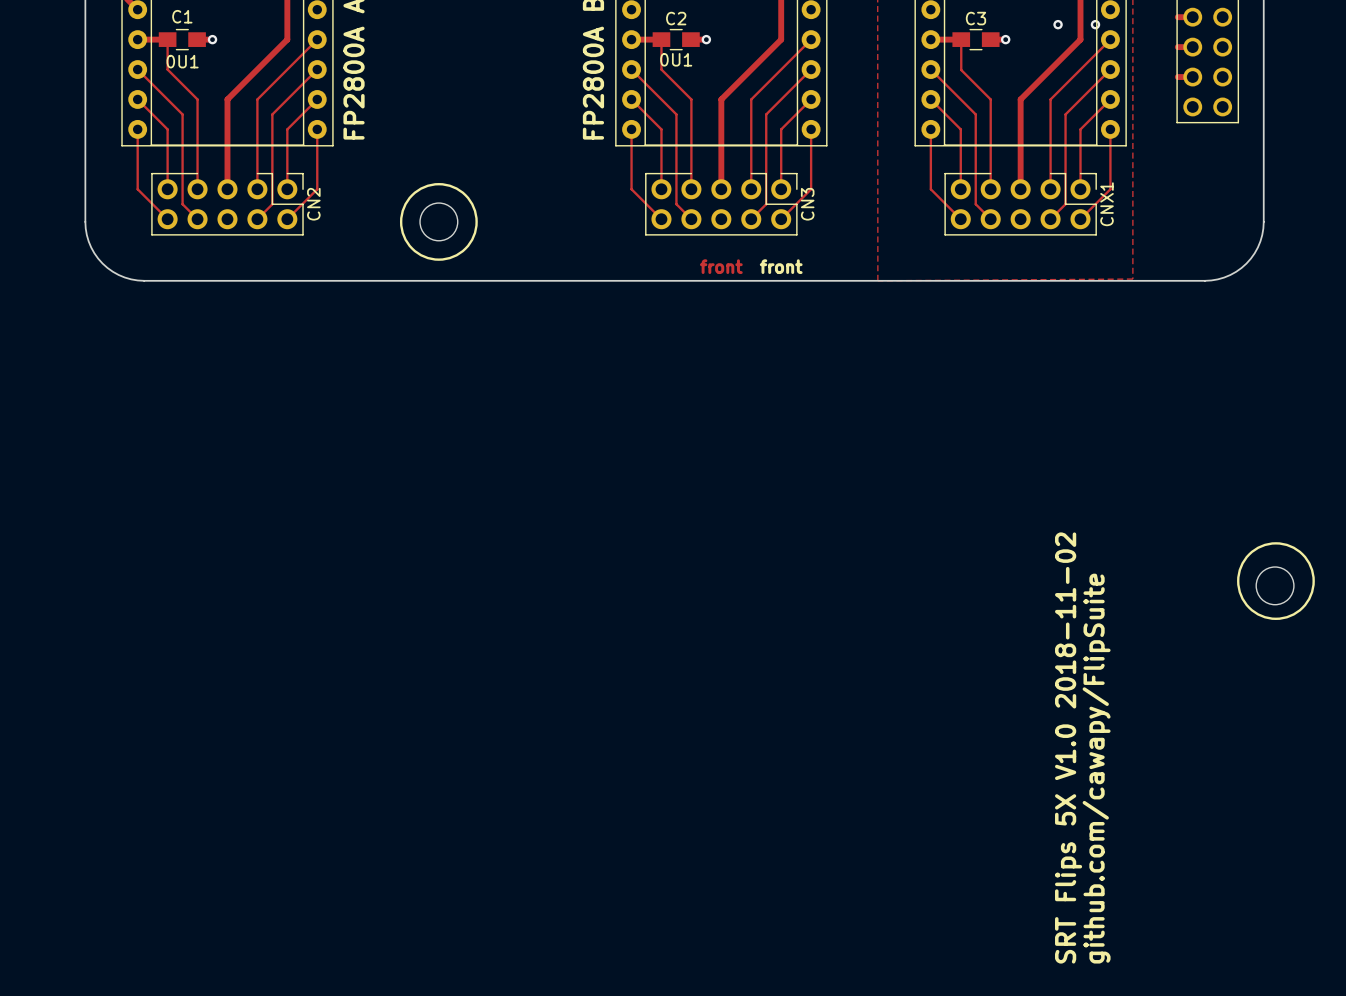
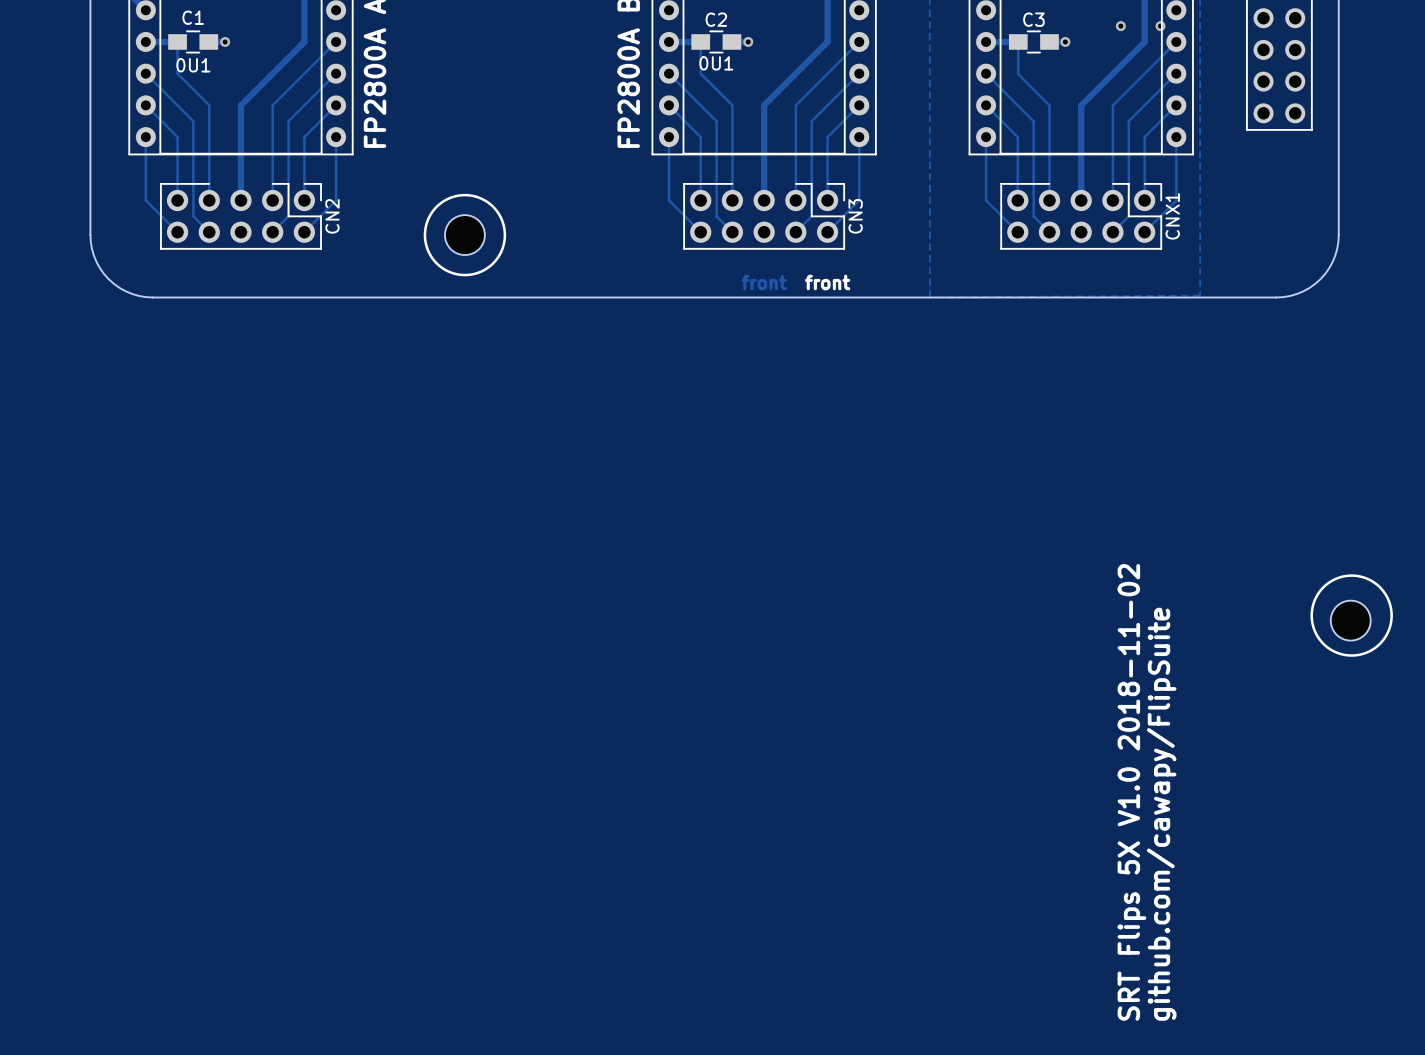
track: (1177, 17) (1192, 17) -> none
track: (1177, 47) (1192, 47) -> none
track: (1177, 77) (1192, 77) -> none

